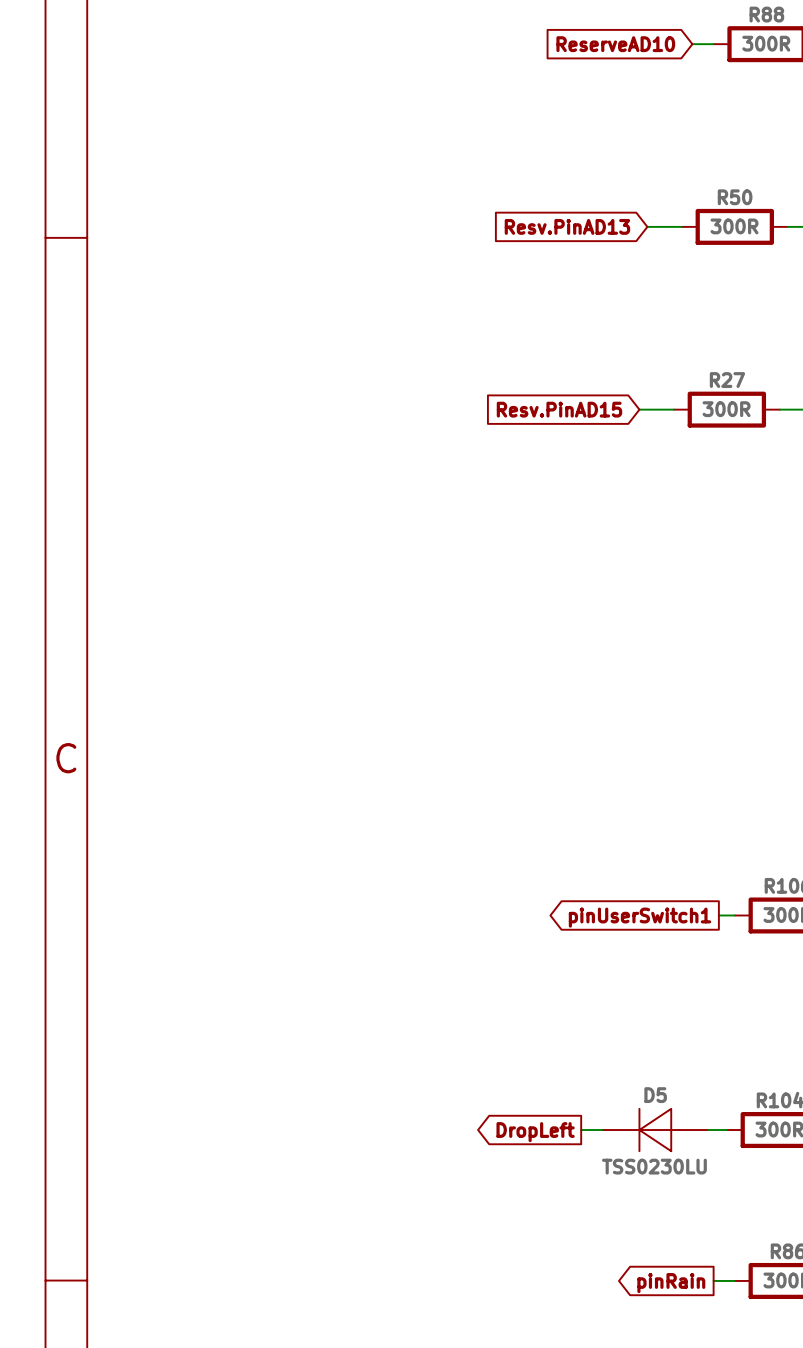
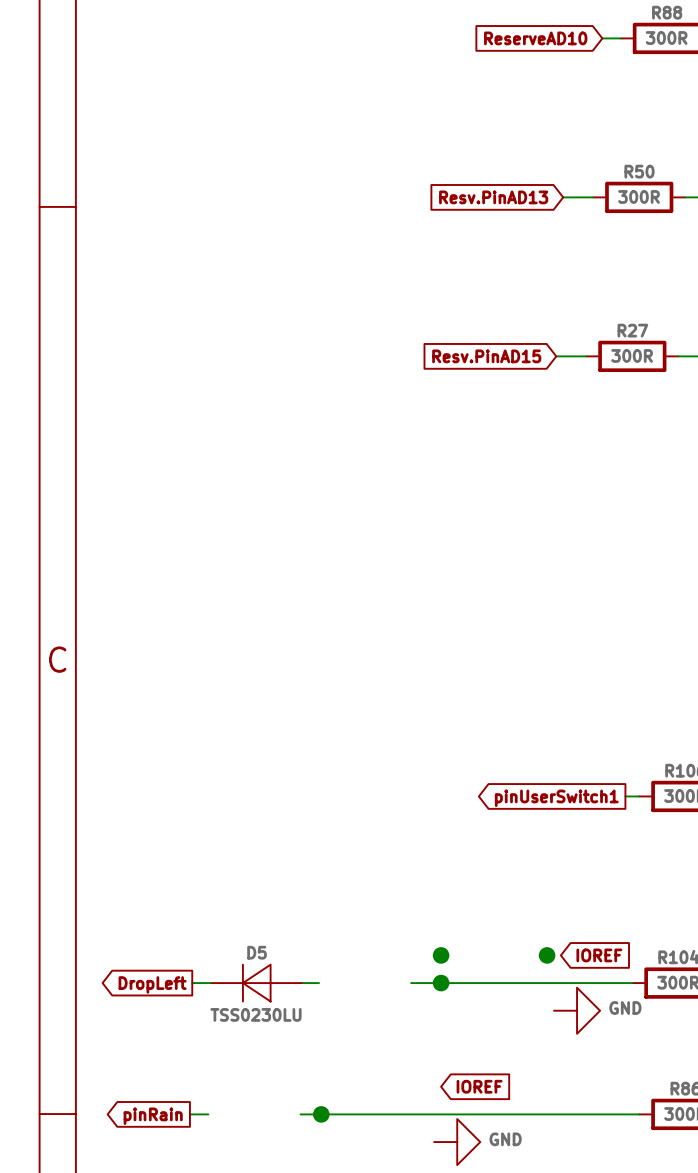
junction: none -> (441, 955)
junction: none -> (547, 955)
global label: none -> IOREF (599, 955)
wire: none -> (192, 983) (210, 983)
wire: none -> (302, 983) (318, 983)
wire: none -> (411, 983) (505, 983)
junction: none -> (441, 983)
D5 position: (655, 1130) -> (256, 983)
global label position: DropLeft (535, 1132) -> DropLeft (152, 984)
power symbol: none -> GND (577, 1010)
global label: none -> IOREF (479, 1086)
wire: none -> (189, 1114) (208, 1114)
wire: none -> (300, 1114) (620, 1114)
junction: none -> (321, 1114)
global label position: pinRain (671, 1283) -> pinRain (153, 1116)
power symbol: none -> GND (457, 1142)

